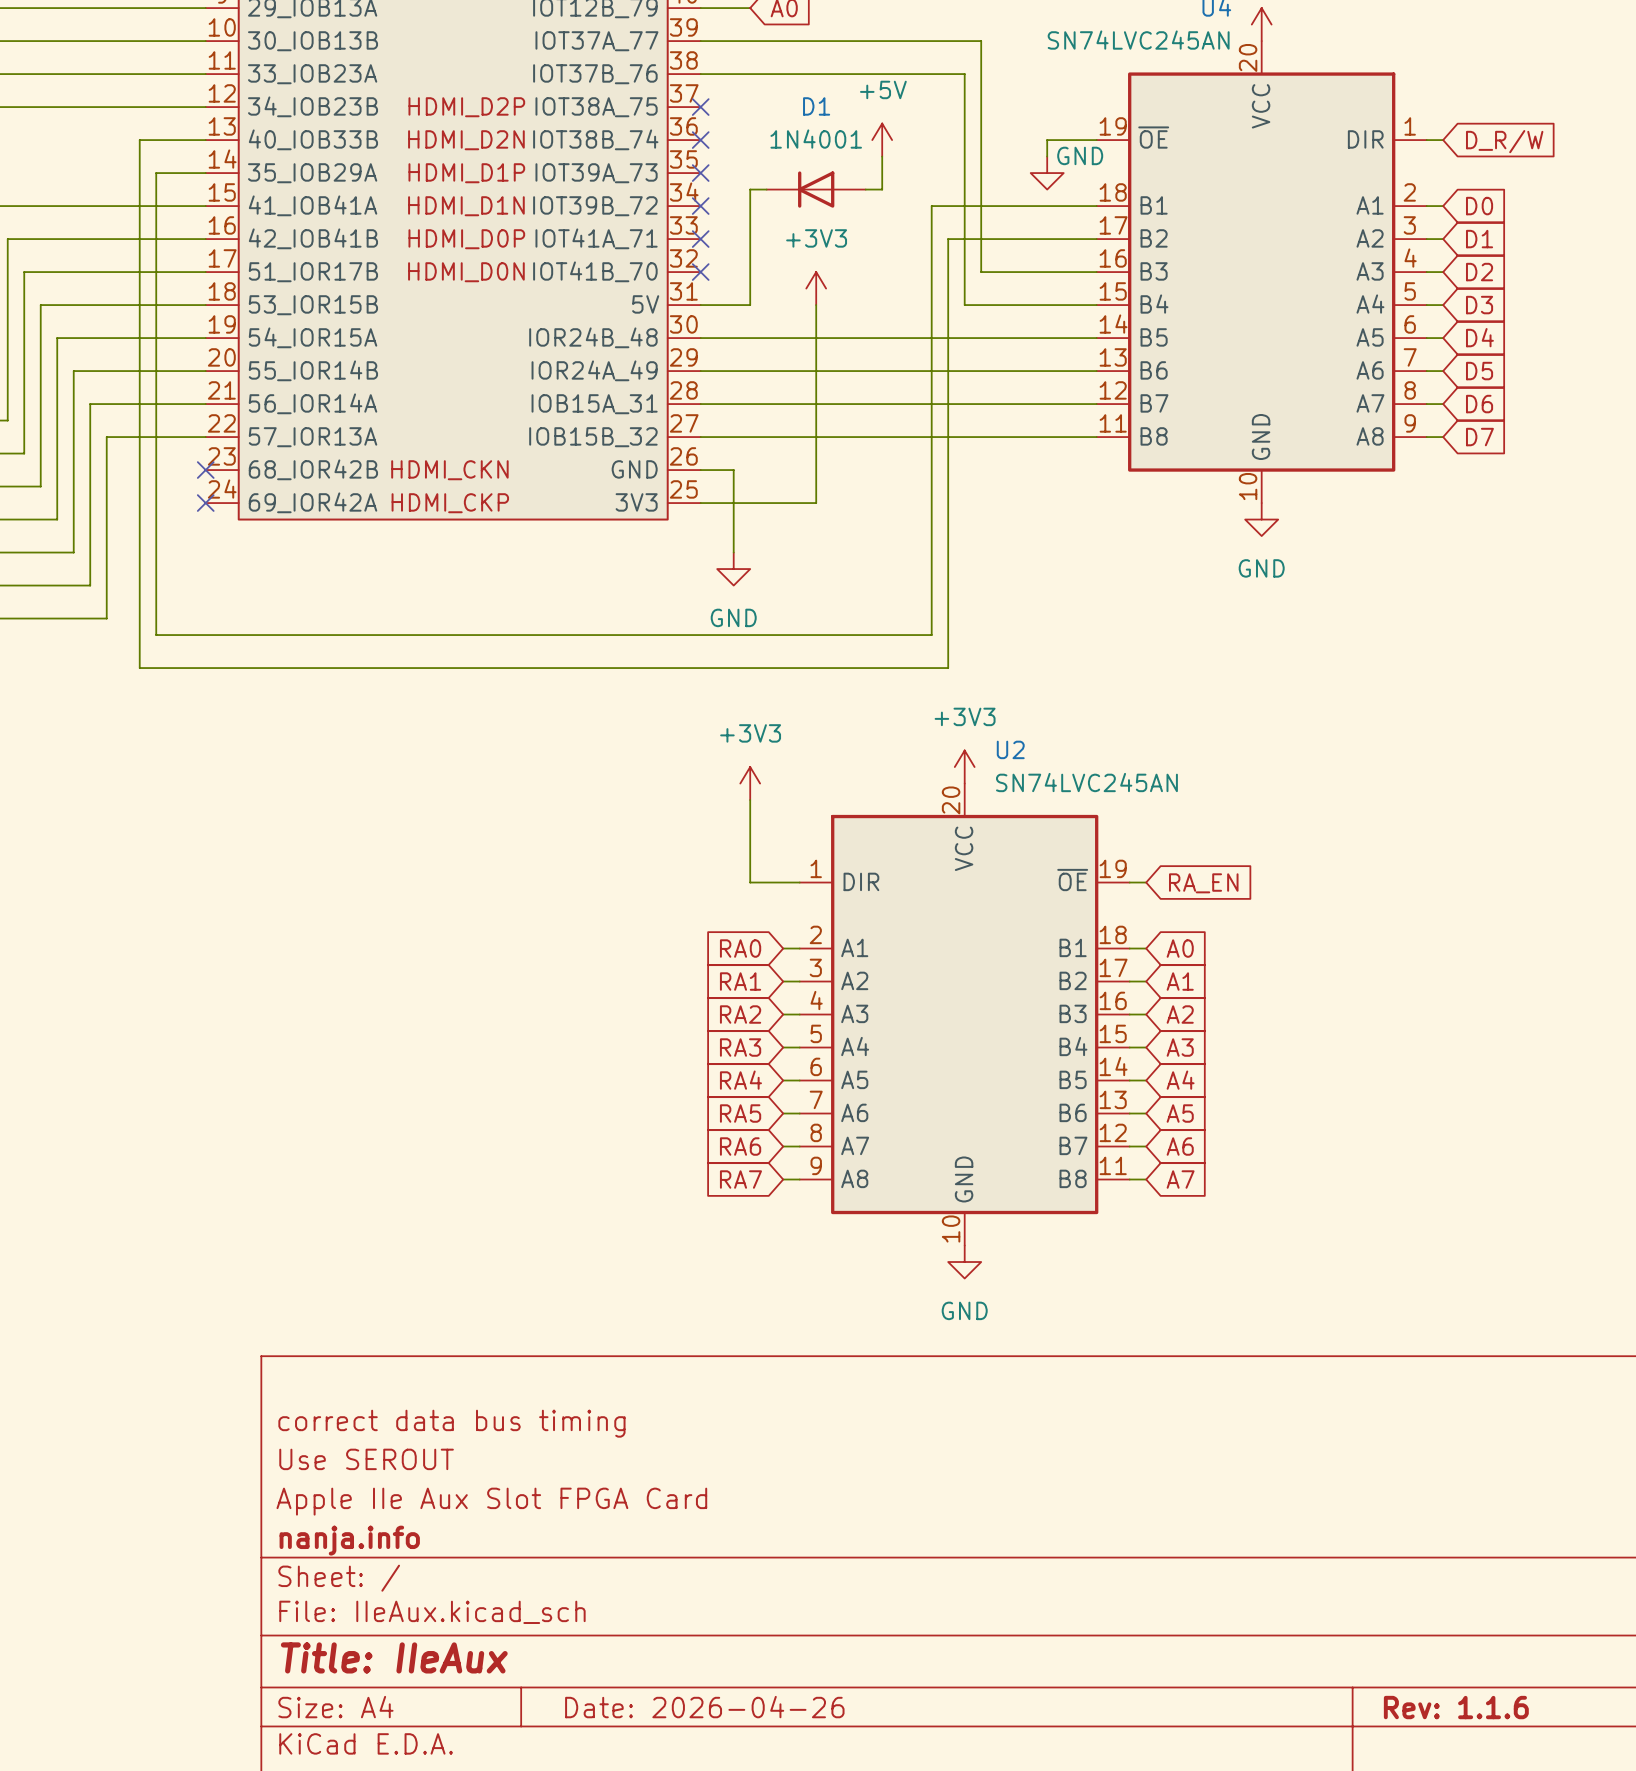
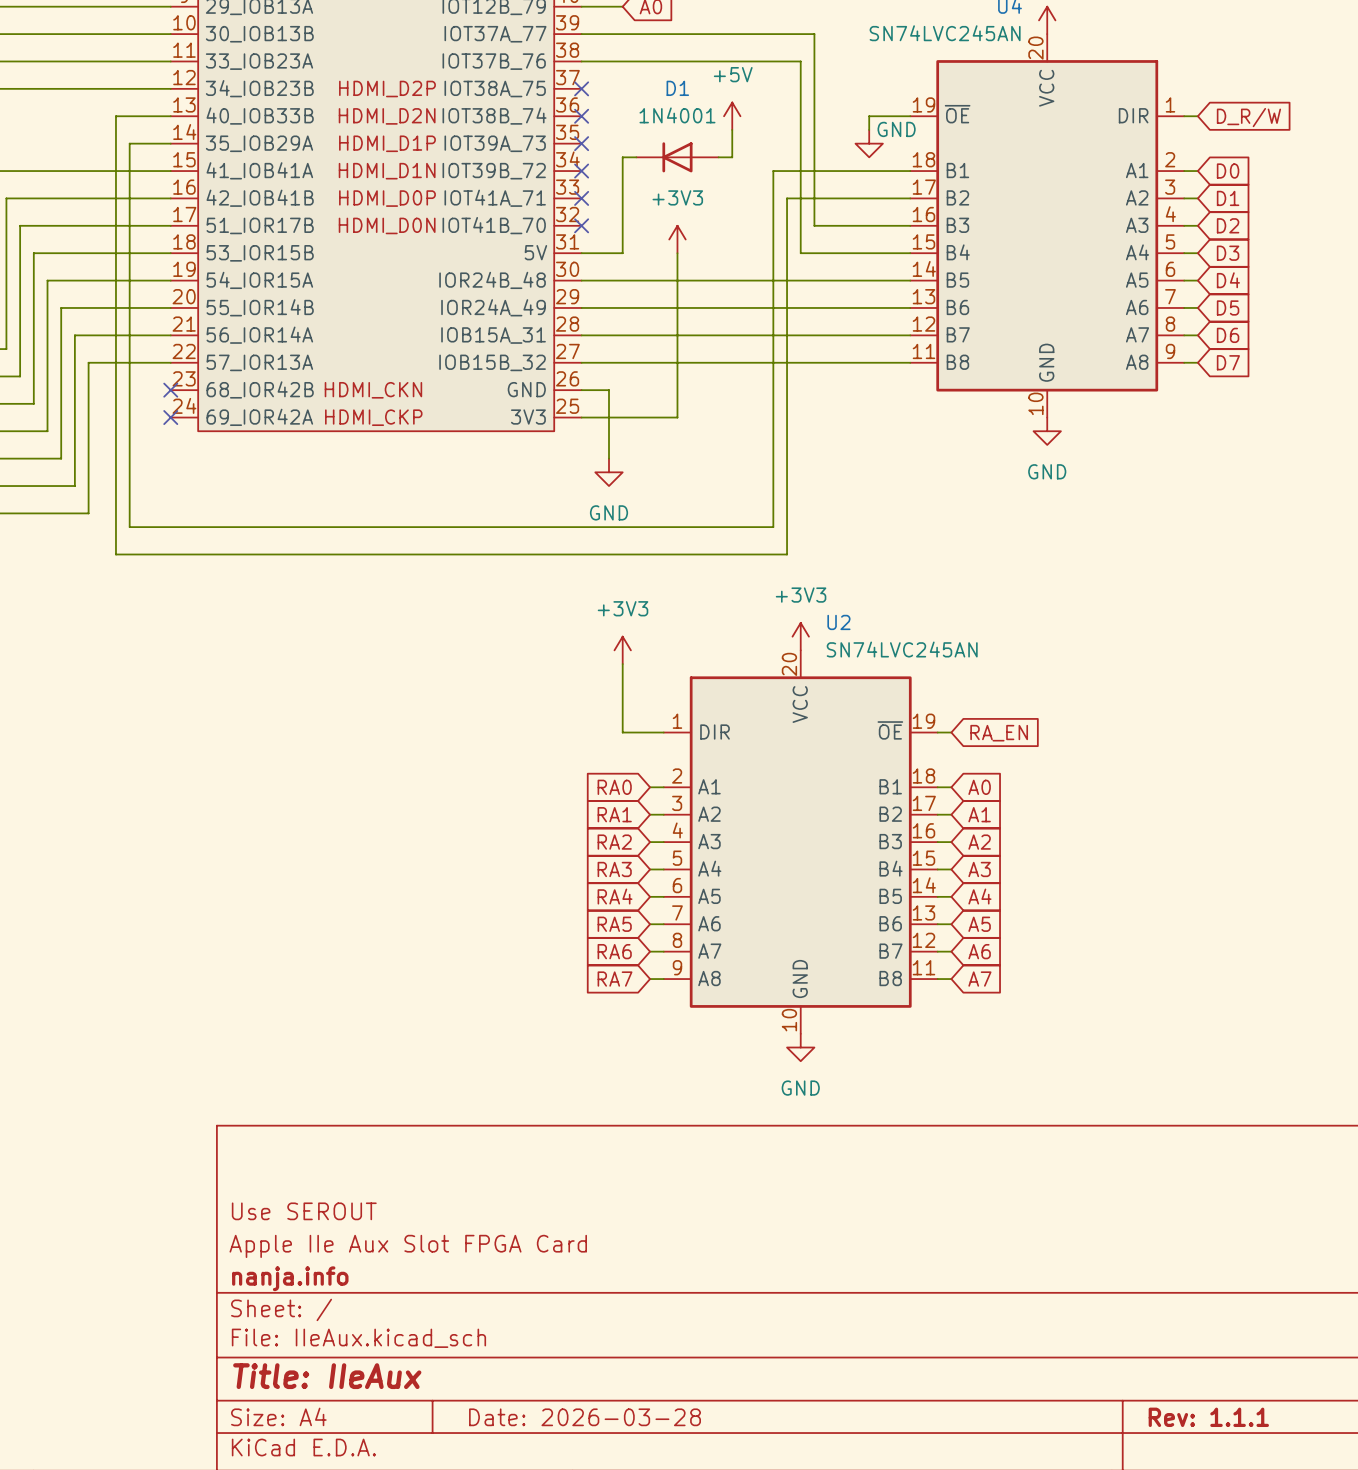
title block: correct data bus timing (451, 1423) -> none
title block: Date: 2026-04-26 (704, 1707) -> Date: 2026-03-28 (585, 1417)
title block: Rev: 1.1.6 (1456, 1707) -> Rev: 1.1.1 (1208, 1417)

